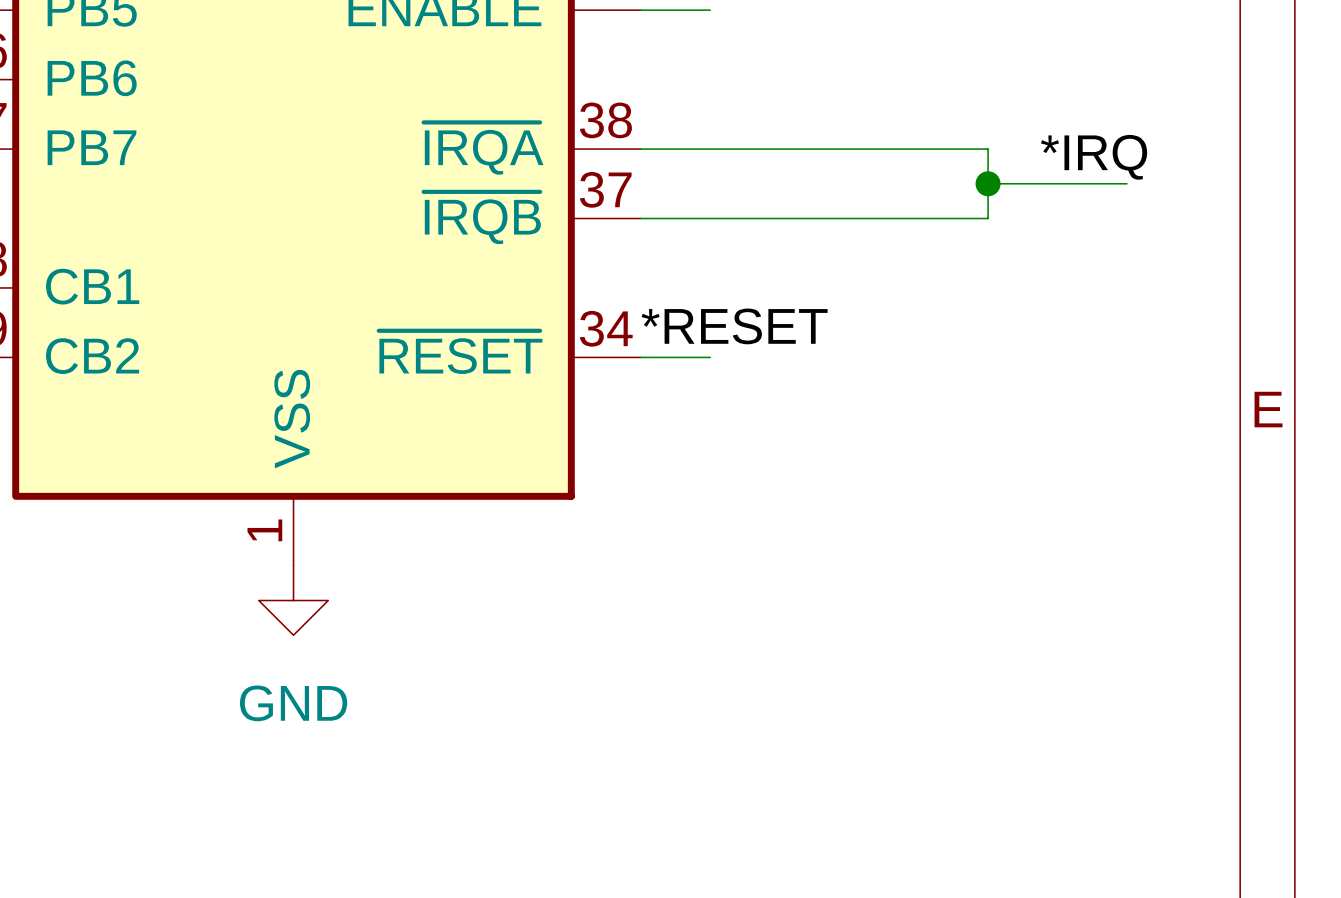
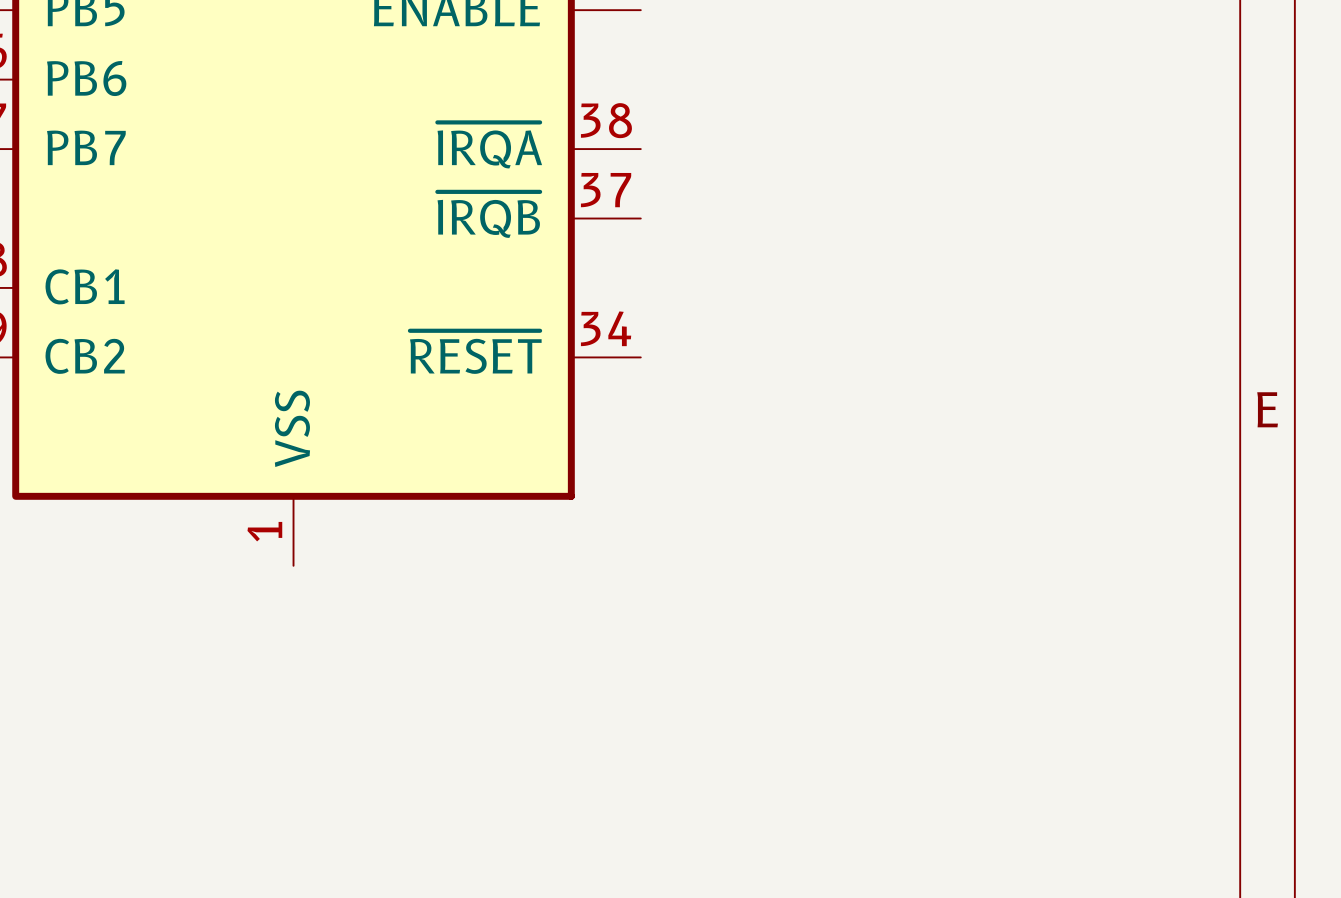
wire: (640, 10) (710, 10) -> none
wire: (640, 149) (988, 149) (988, 218) (640, 218) -> none
label: *IRQ (1094, 157) -> none
wire: (988, 183) (1126, 183) -> none
junction: (988, 183) -> none
label: *RESET (734, 326) -> none
wire: (640, 357) (710, 357) -> none
power symbol: GND (293, 600) -> none

